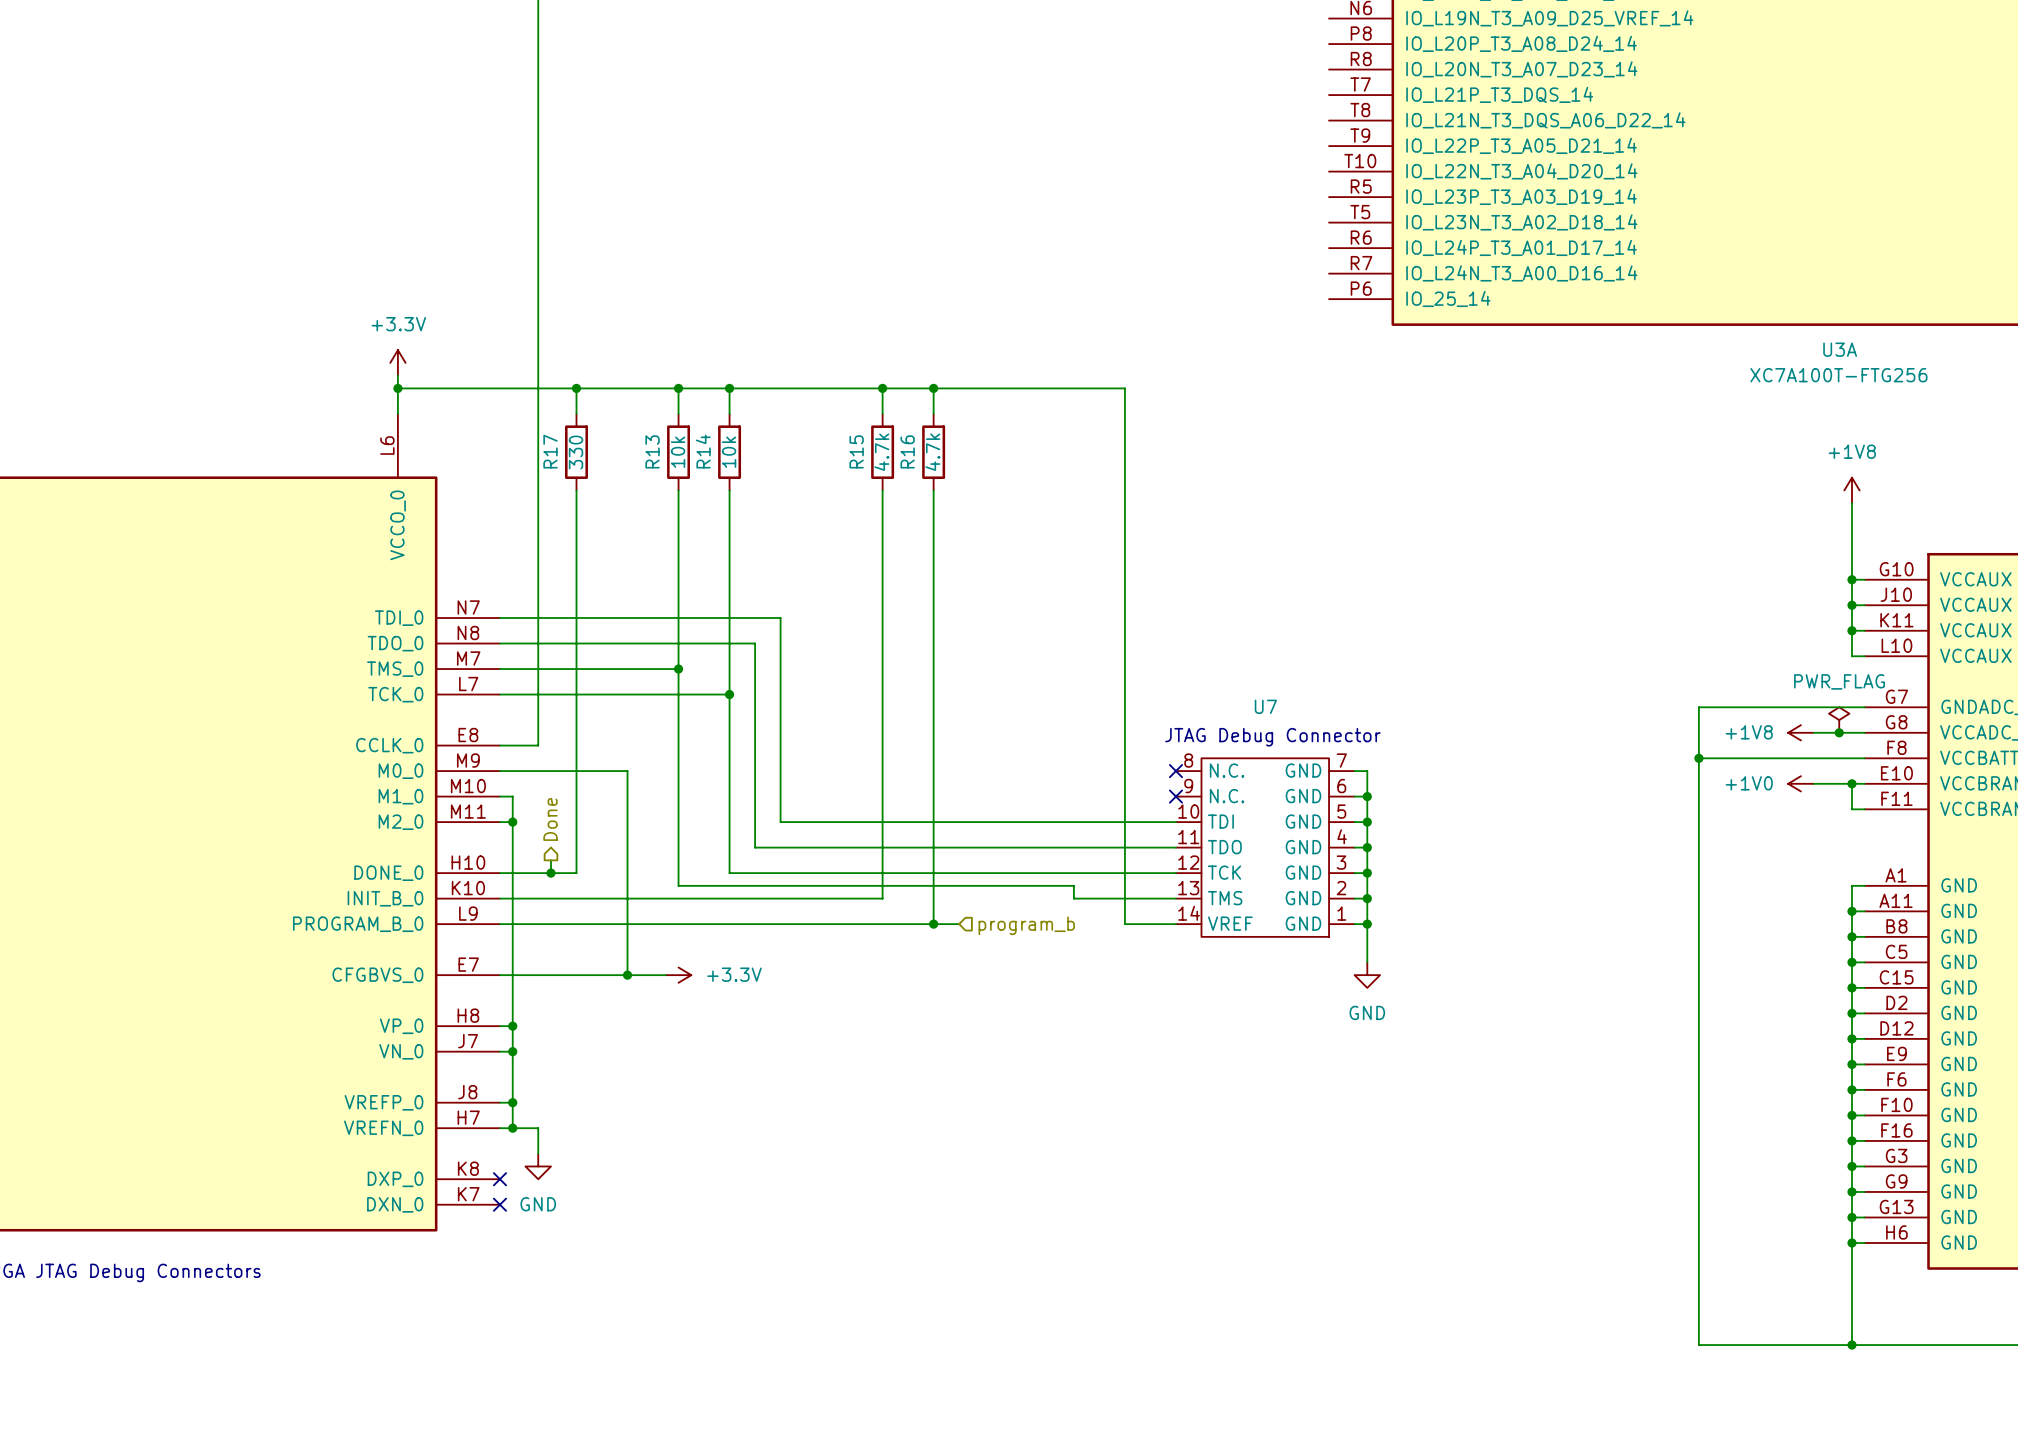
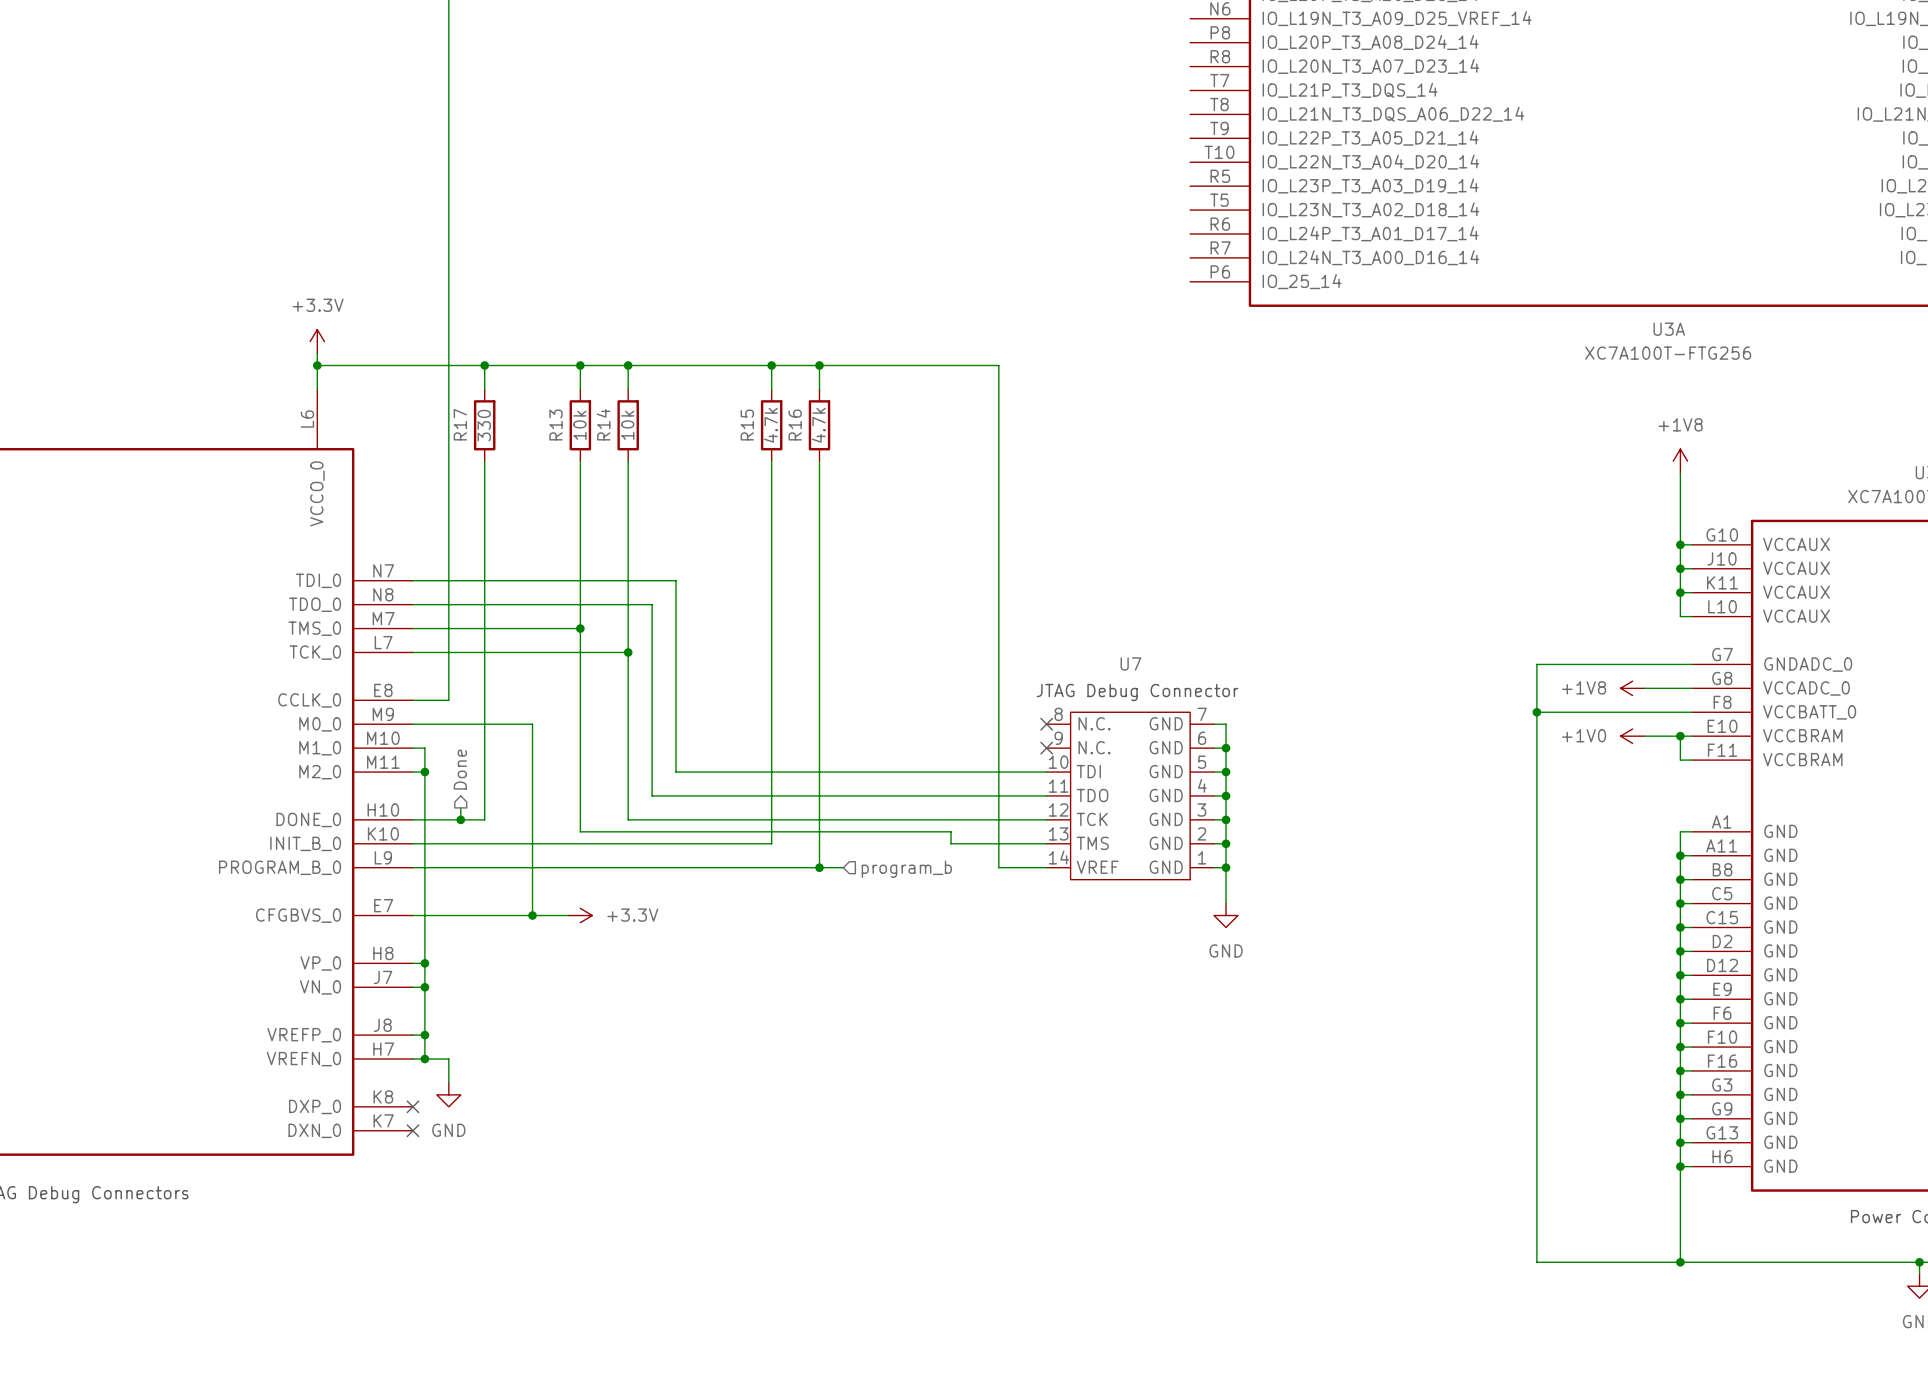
power symbol: PWR_FLAG (1839, 720) -> none
junction: (1839, 732) -> none

